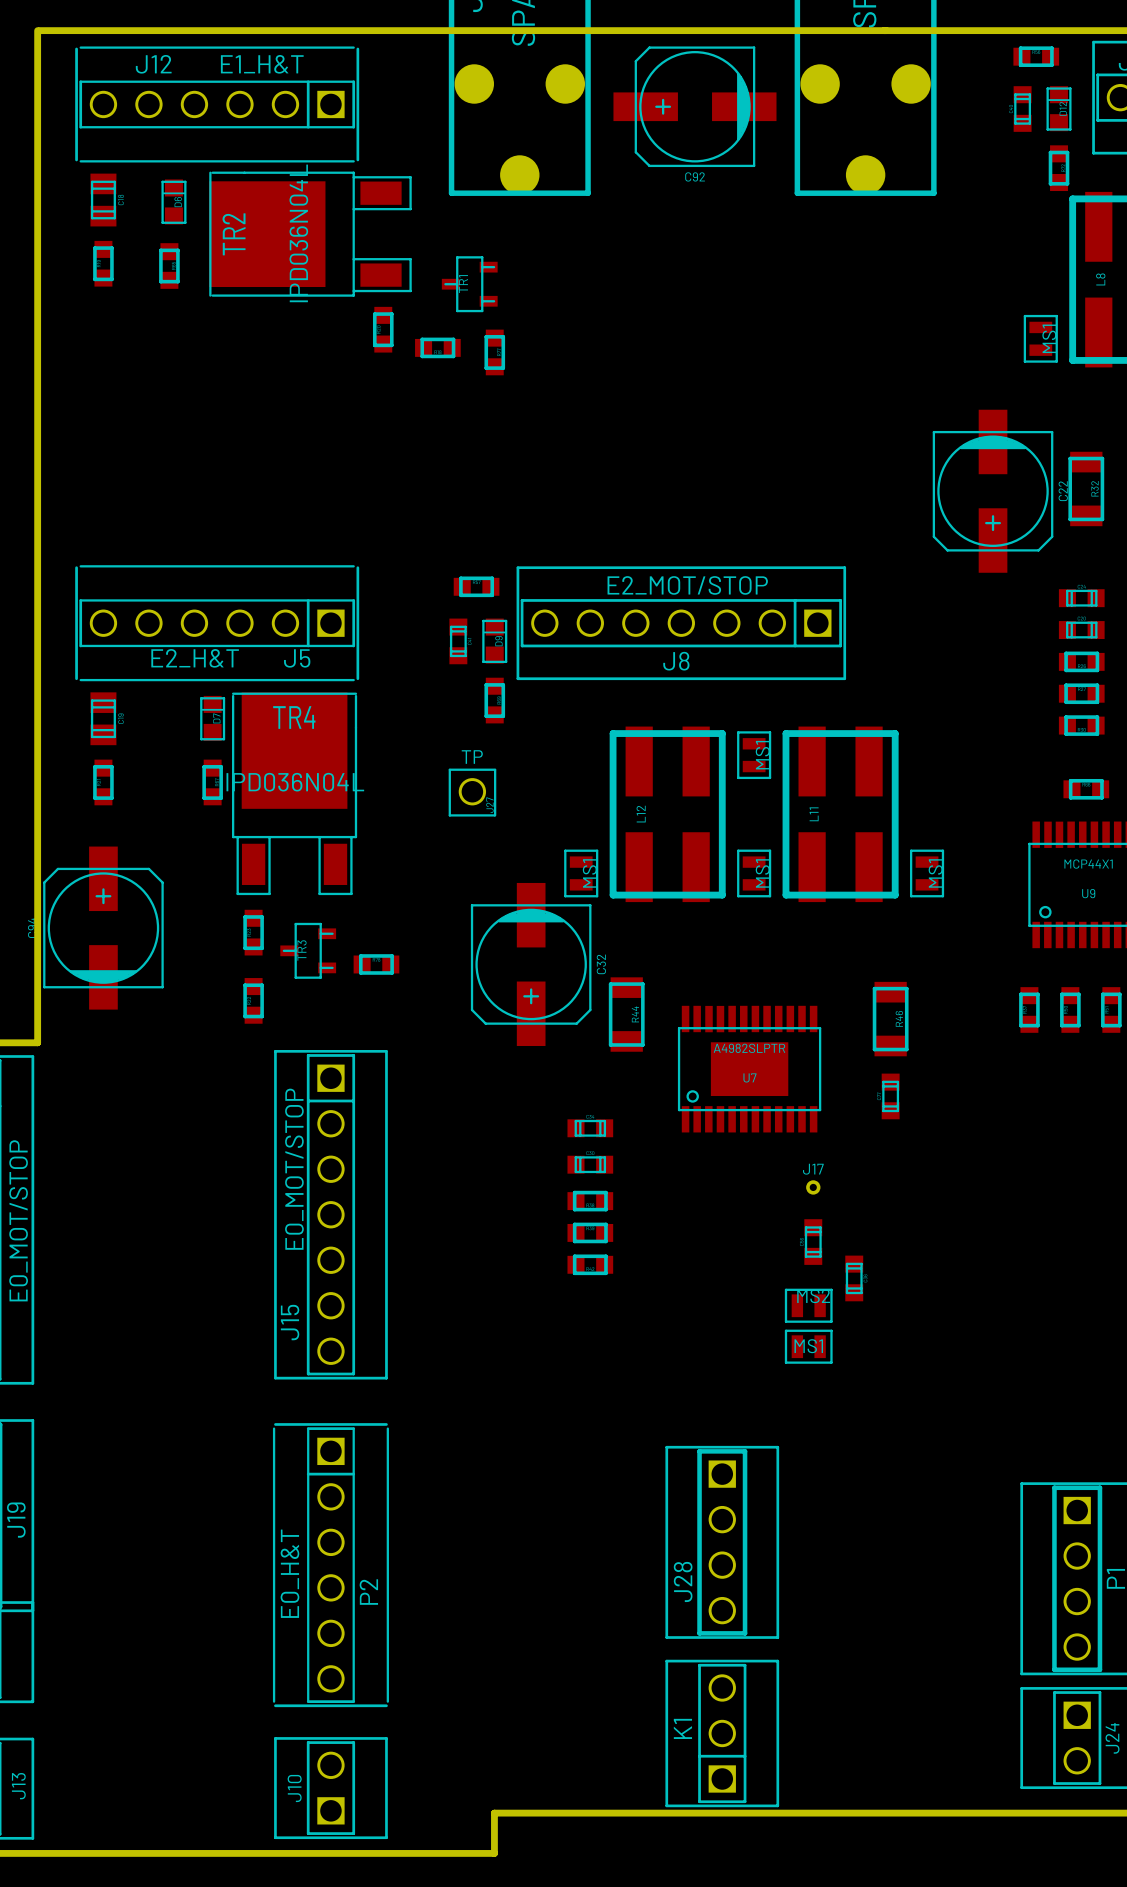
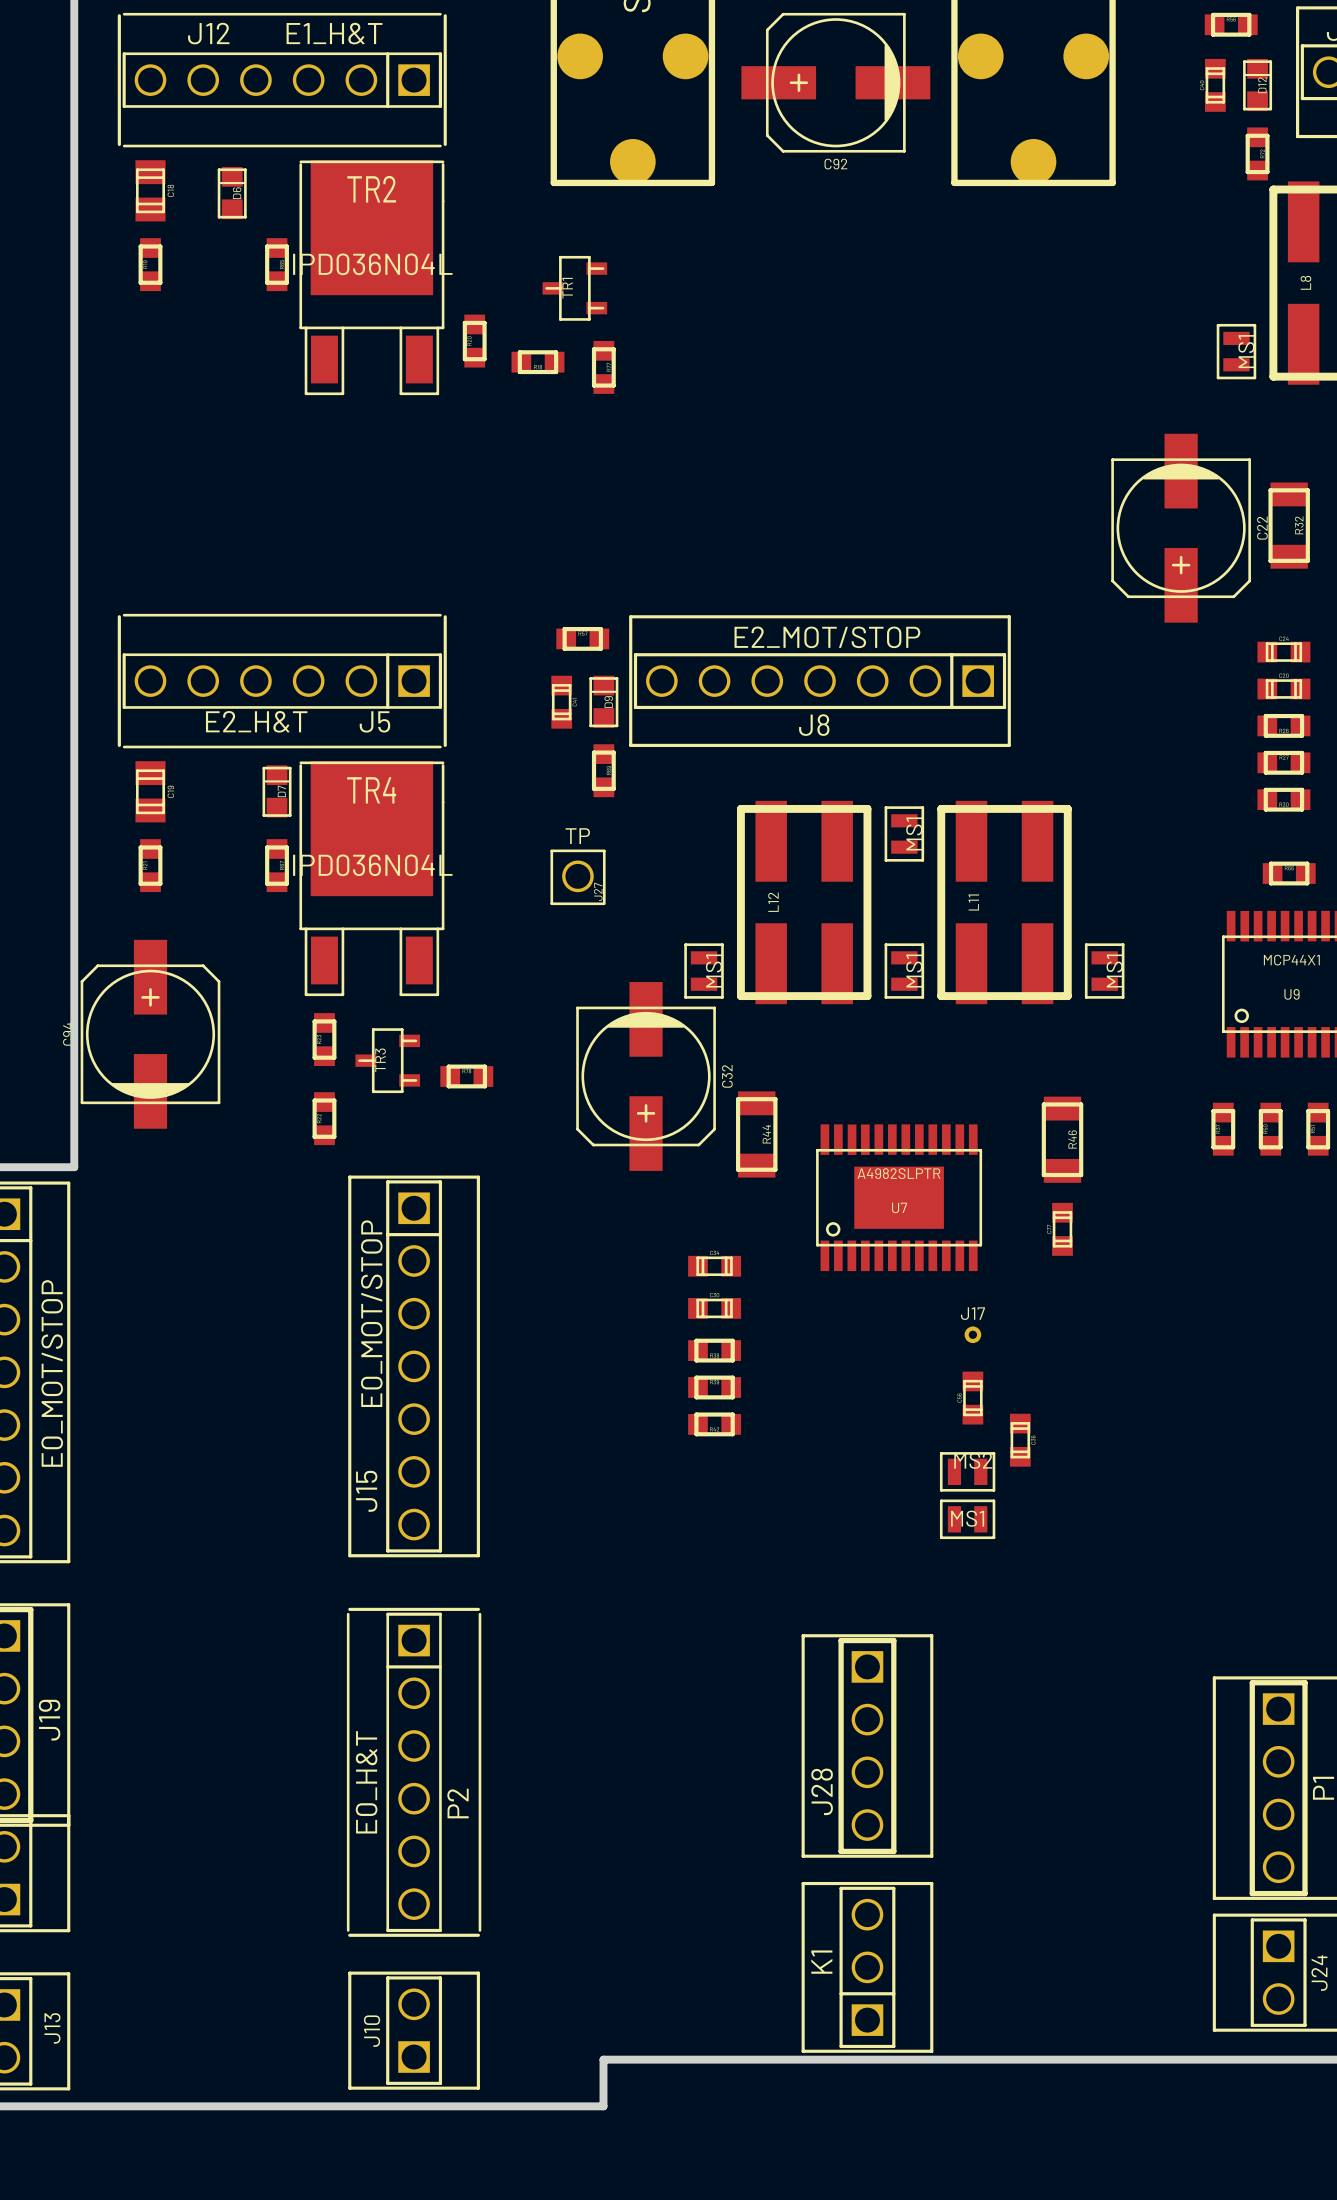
TR2 rotation: 0° (310, 234) -> 90° clockwise (371, 277)
part position: (169, 266) -> (277, 264)

